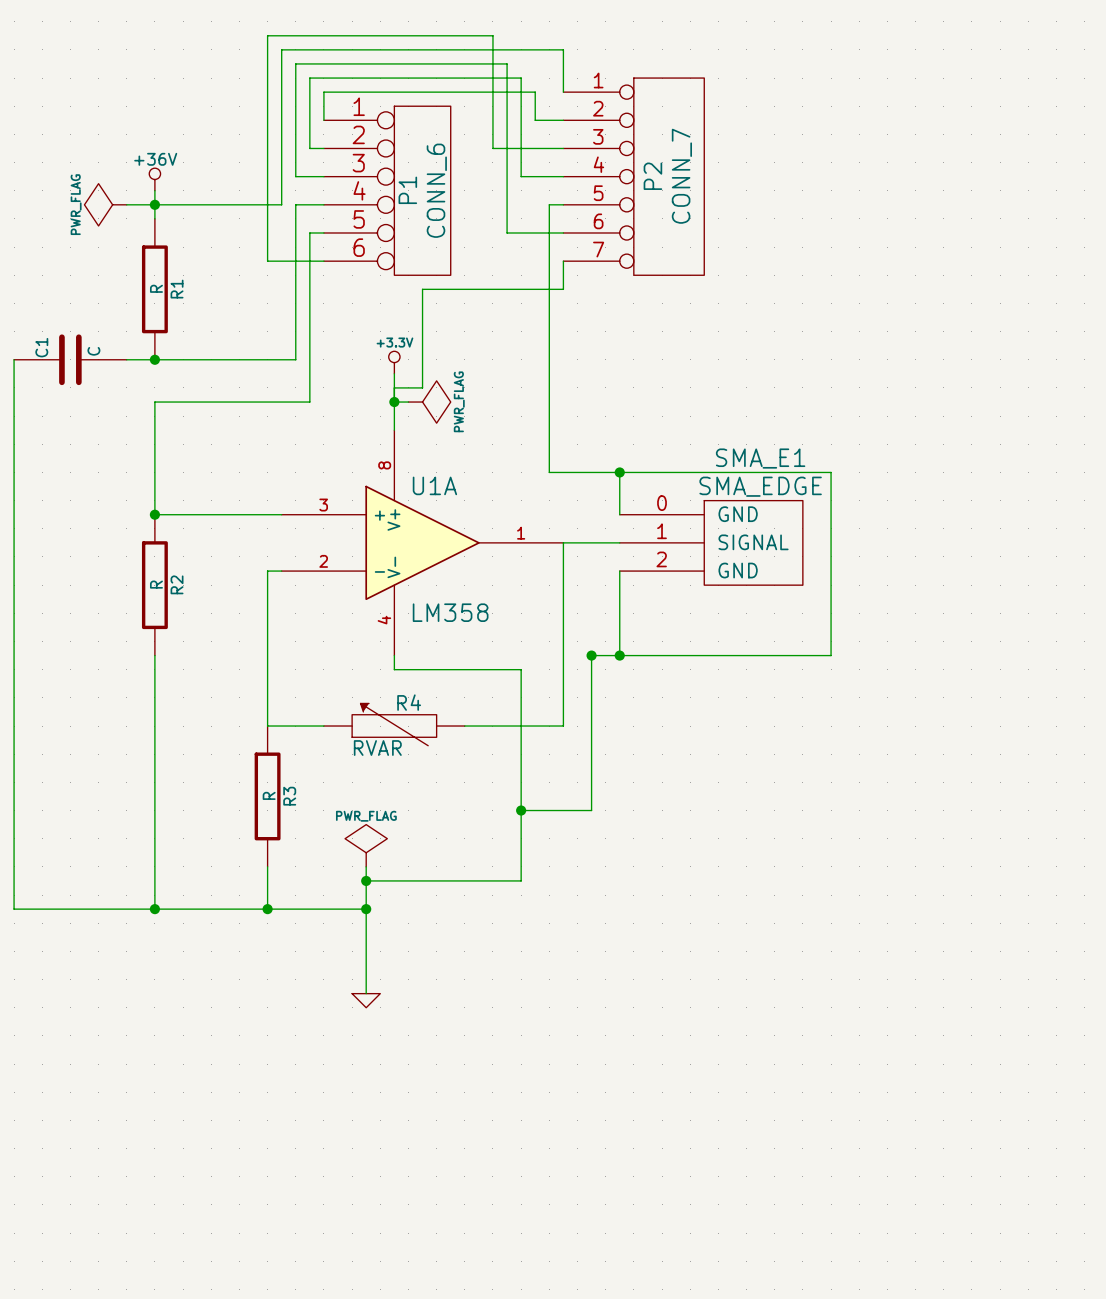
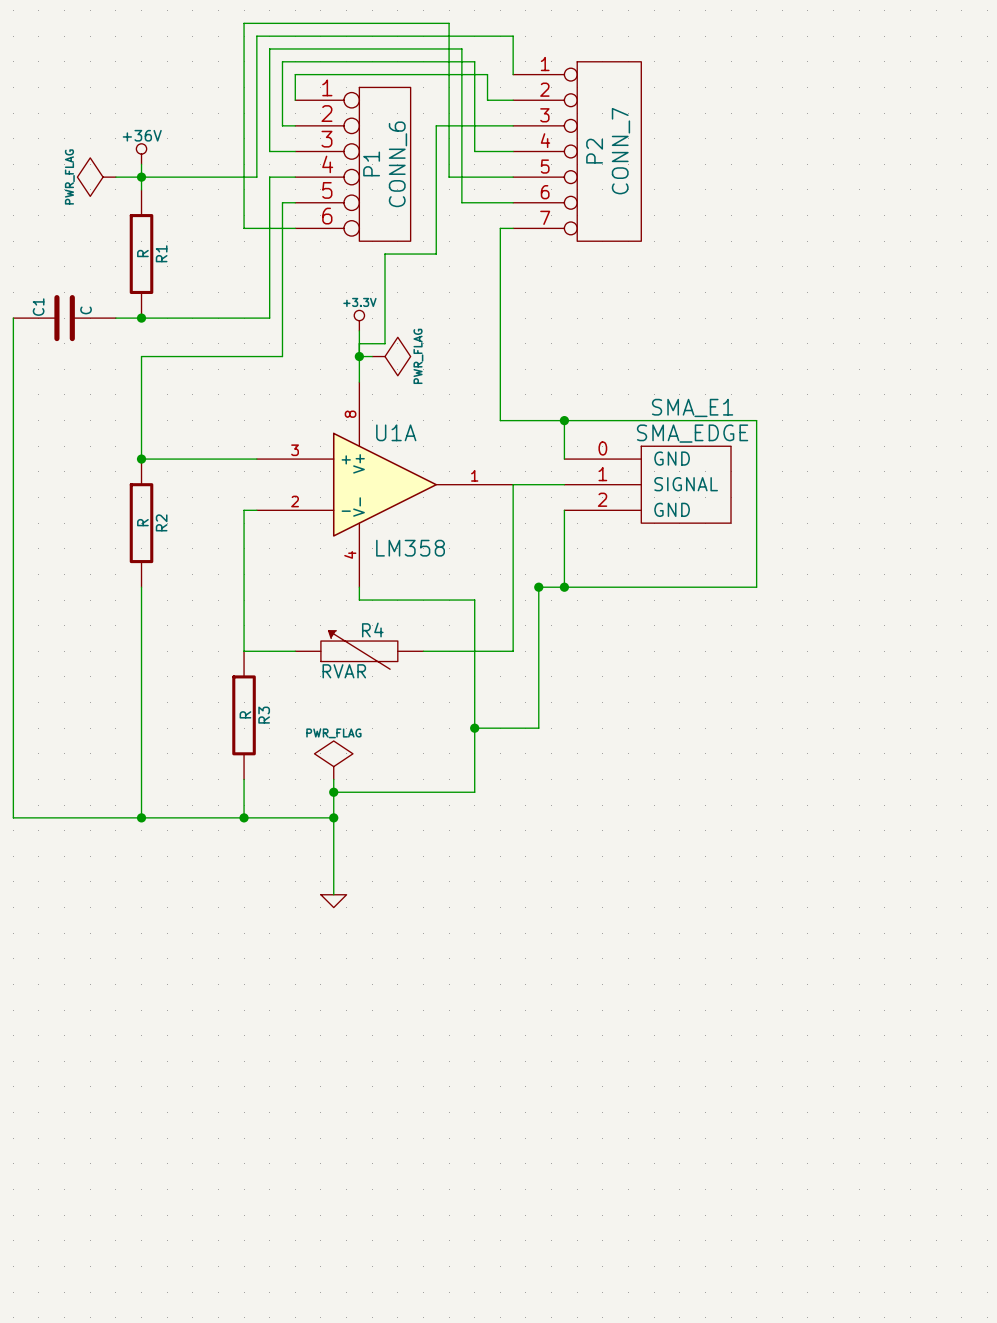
wire: (549, 204) (549, 261) -> (513, 228) (500, 228)
wire: (563, 261) (563, 289) (478, 289) -> (500, 177) (449, 177) (449, 125) (436, 125) (436, 254)

